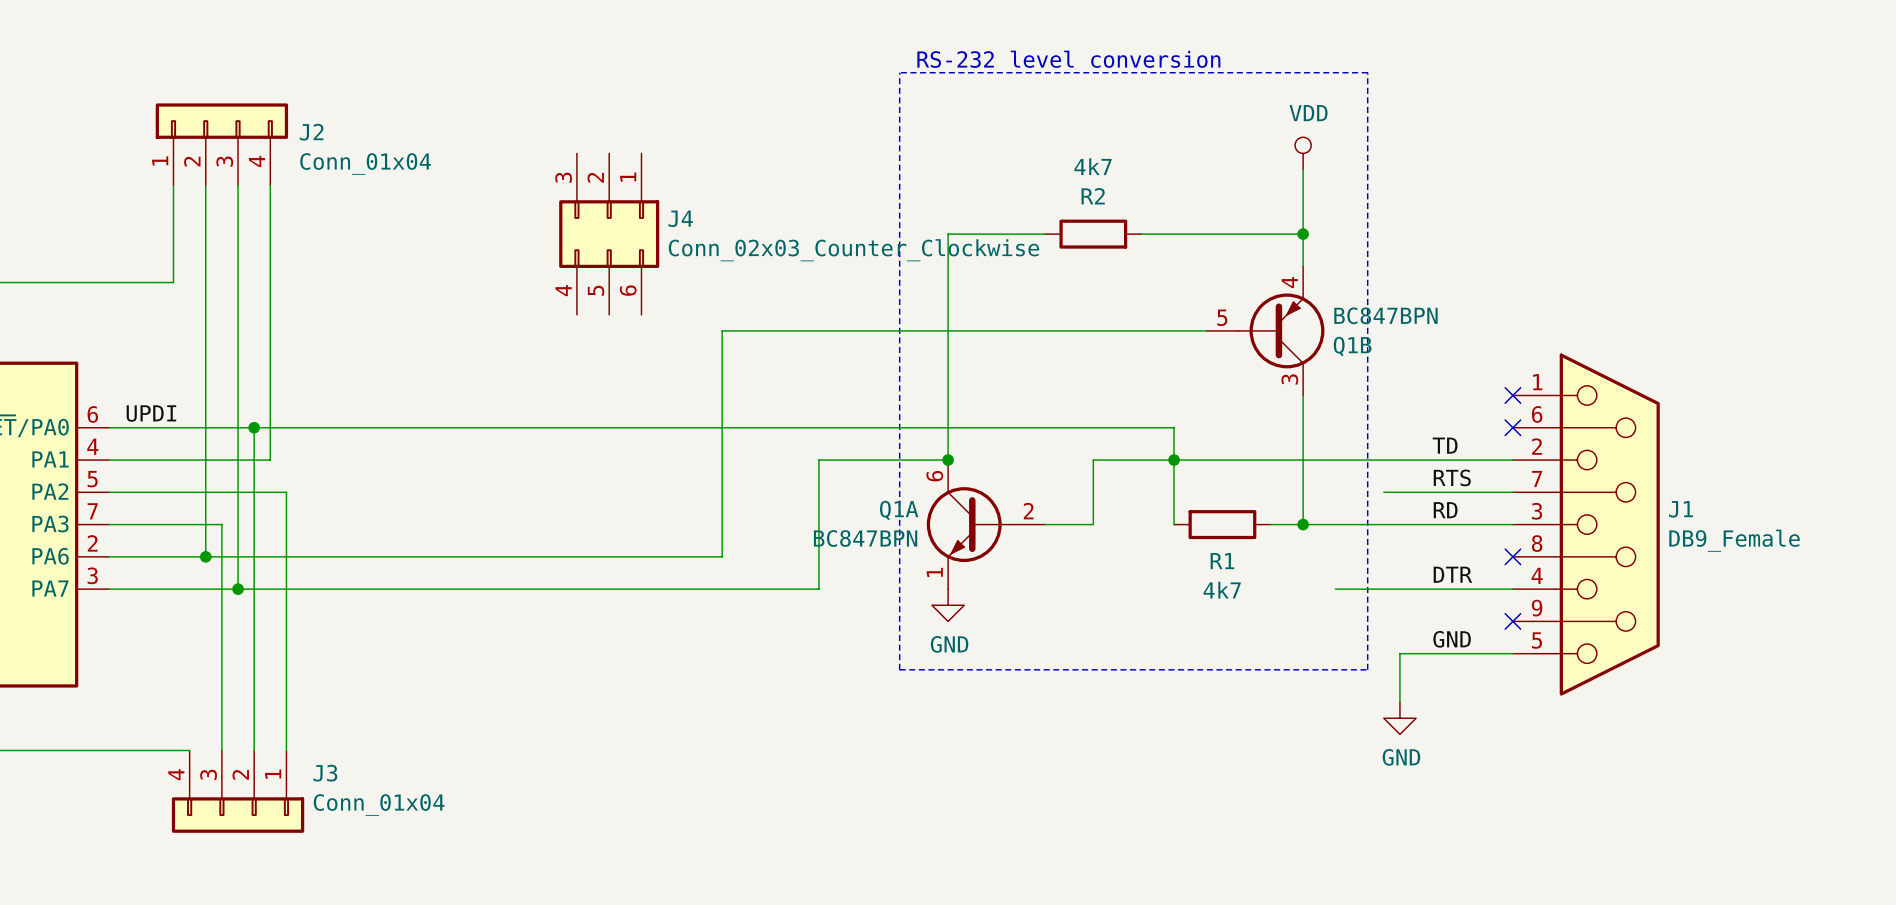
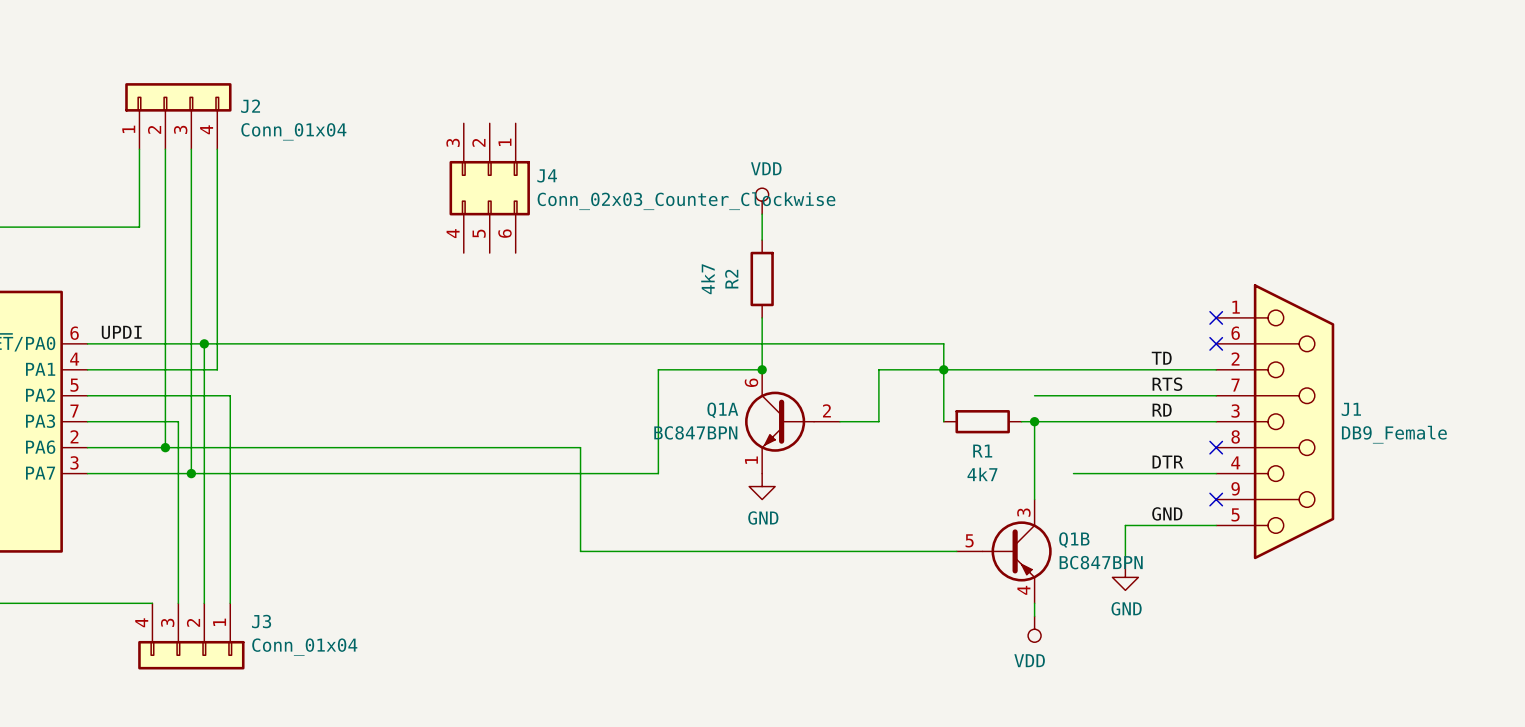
text: RS-232 level conversion (1068, 59) -> none
line: (899, 72) (1367, 72) (1367, 669) (899, 669) (899, 72) -> none
power symbol: VDD (1303, 153) -> none
R2 value position: 4k7 (1093, 166) -> 4k7 (707, 279)
wire: (1303, 169) (1303, 266) -> none
R2 name position: R2 (1093, 196) -> R2 (731, 279)
wire: (1044, 234) (948, 234) (948, 266) -> none
R2 rotation: 0° (1093, 234) -> 90° clockwise (762, 279)
R2 position: (1093, 234) -> (762, 279)
wire: (1141, 234) (1303, 234) -> none
junction: (1303, 234) -> none
power symbol: none -> VDD (762, 201)
wire: (948, 298) (948, 395) -> none
wire: (1206, 330) (722, 330) (722, 556) -> (956, 551) (580, 551) (580, 447)
Q1B position: (1265, 330) -> (1004, 551)
Q1B flip: as is (1281, 330) -> up-down (1017, 551)
wire: (1303, 395) (1303, 524) -> none
wire: none -> (1034, 395) (1112, 395)
wire: none -> (1034, 421) (1034, 499)
junction position: (1303, 524) -> (1034, 421)
wire: none -> (1034, 603) (1034, 616)
power symbol: none -> VDD (1034, 629)

